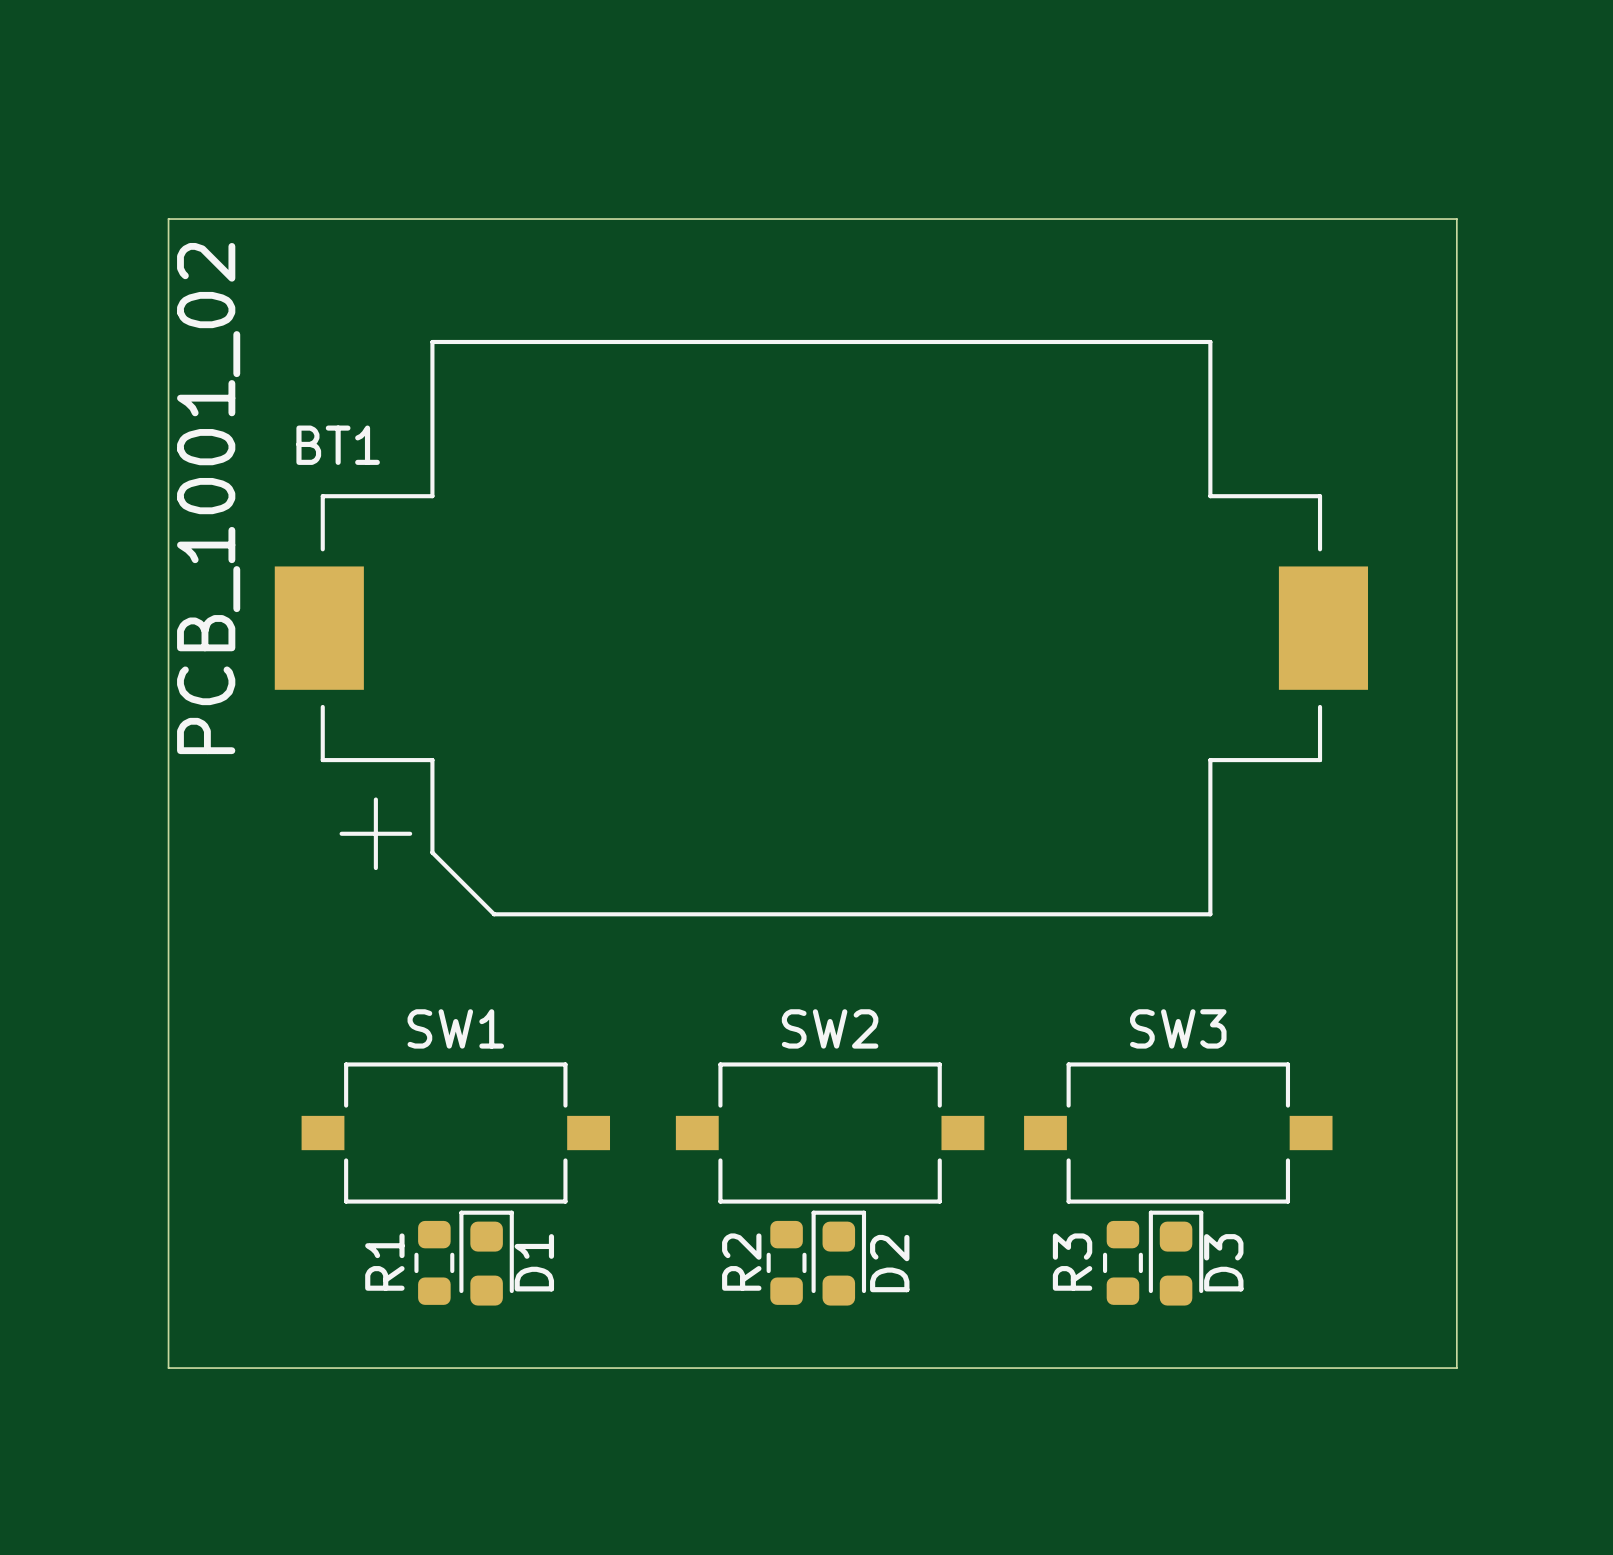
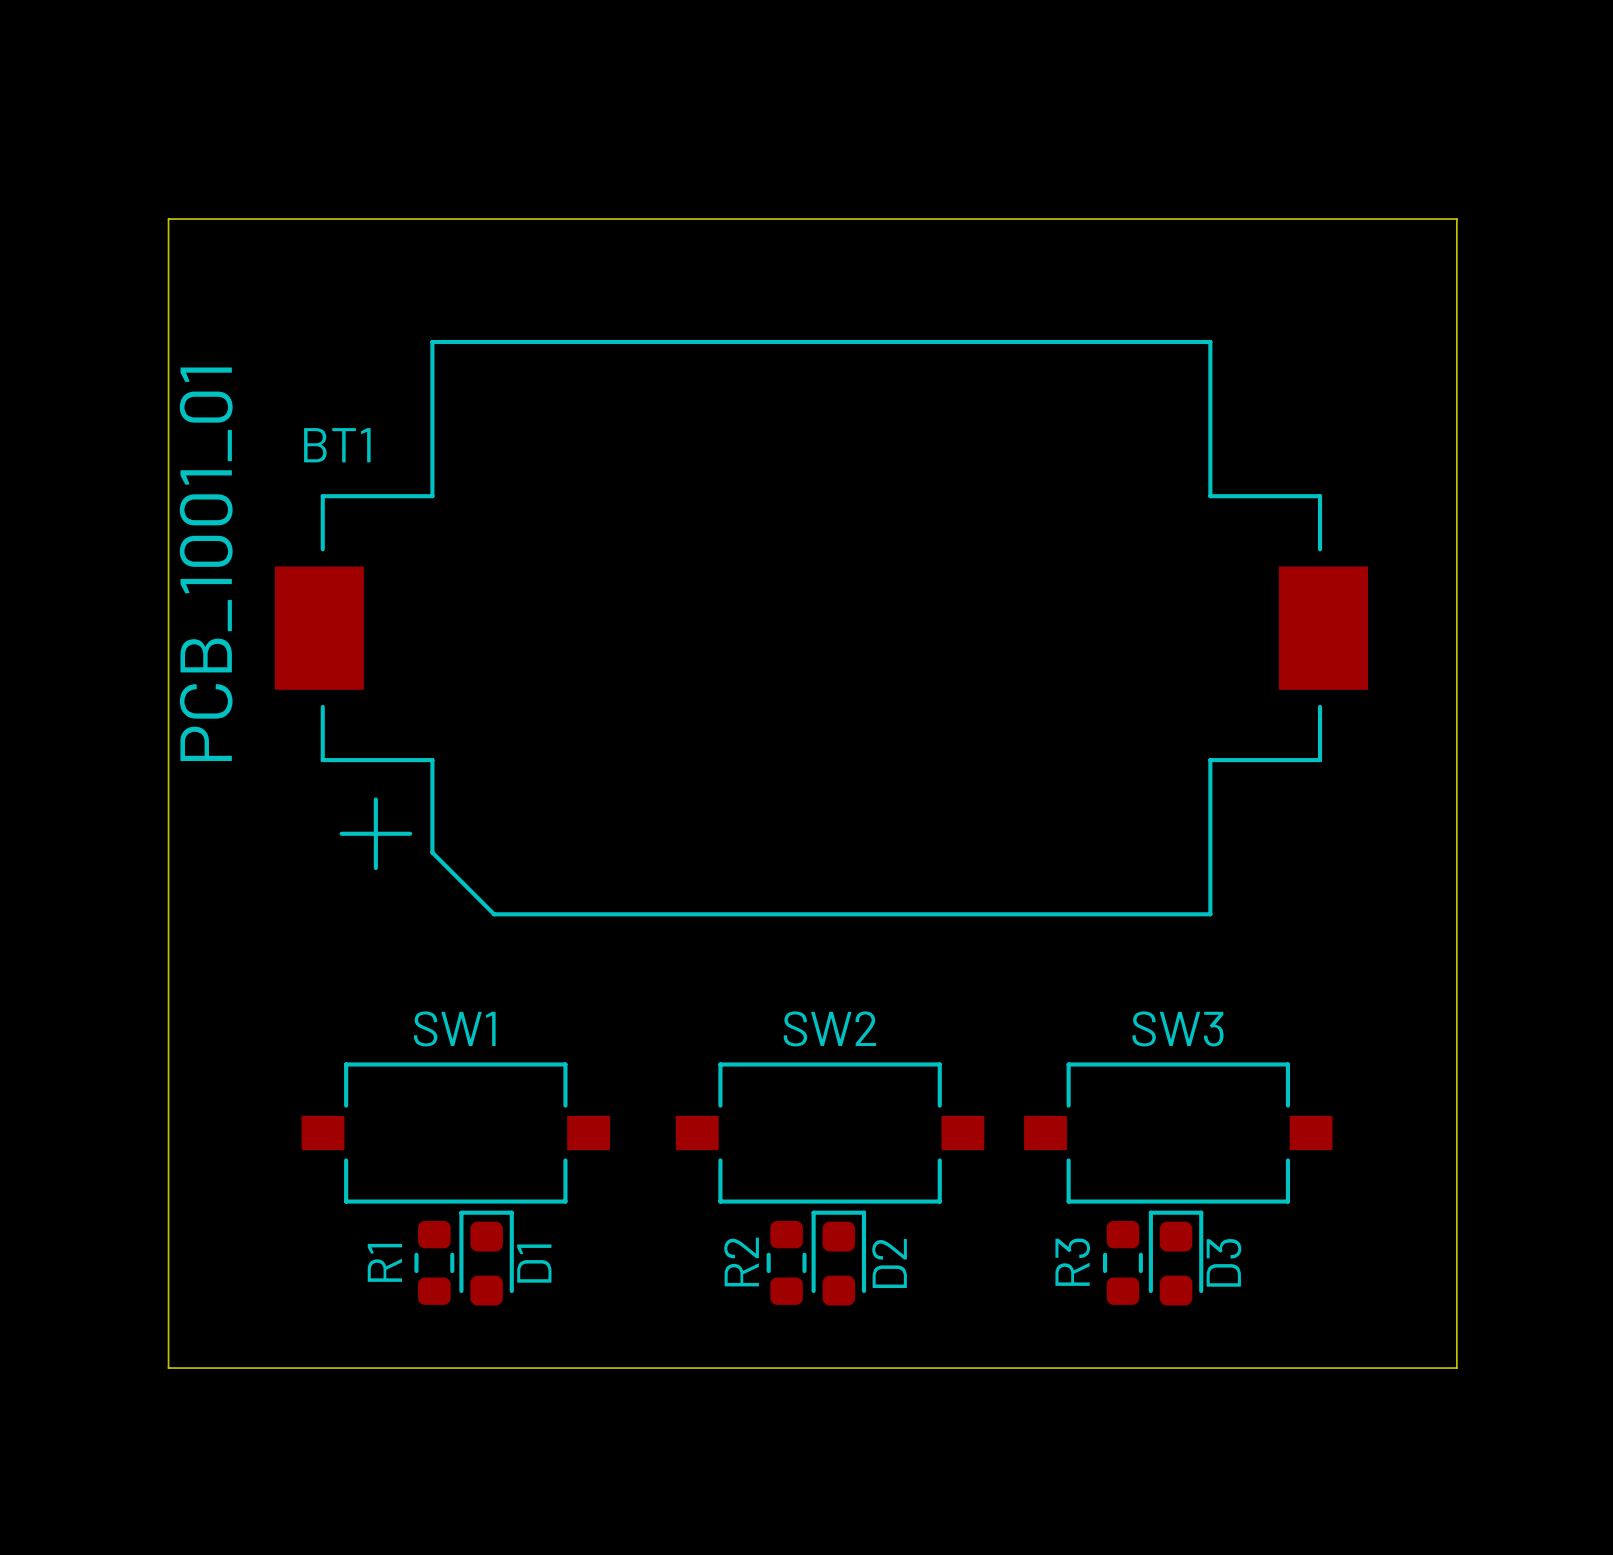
text: PCB_1001_02 (208, 498) -> PCB_1001_01 (206, 564)

